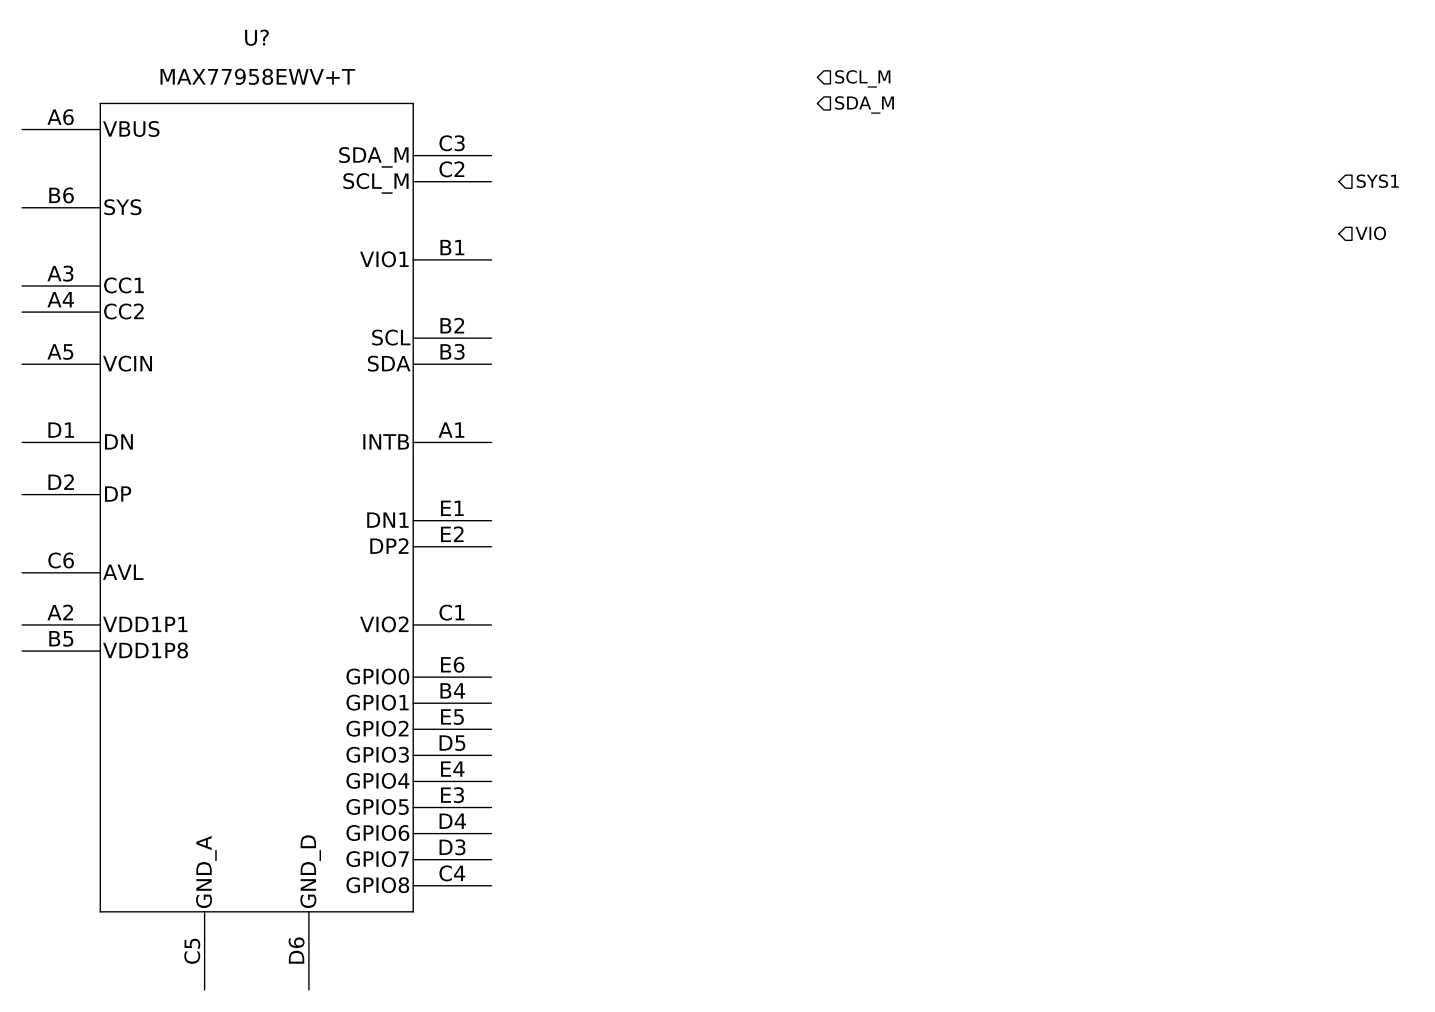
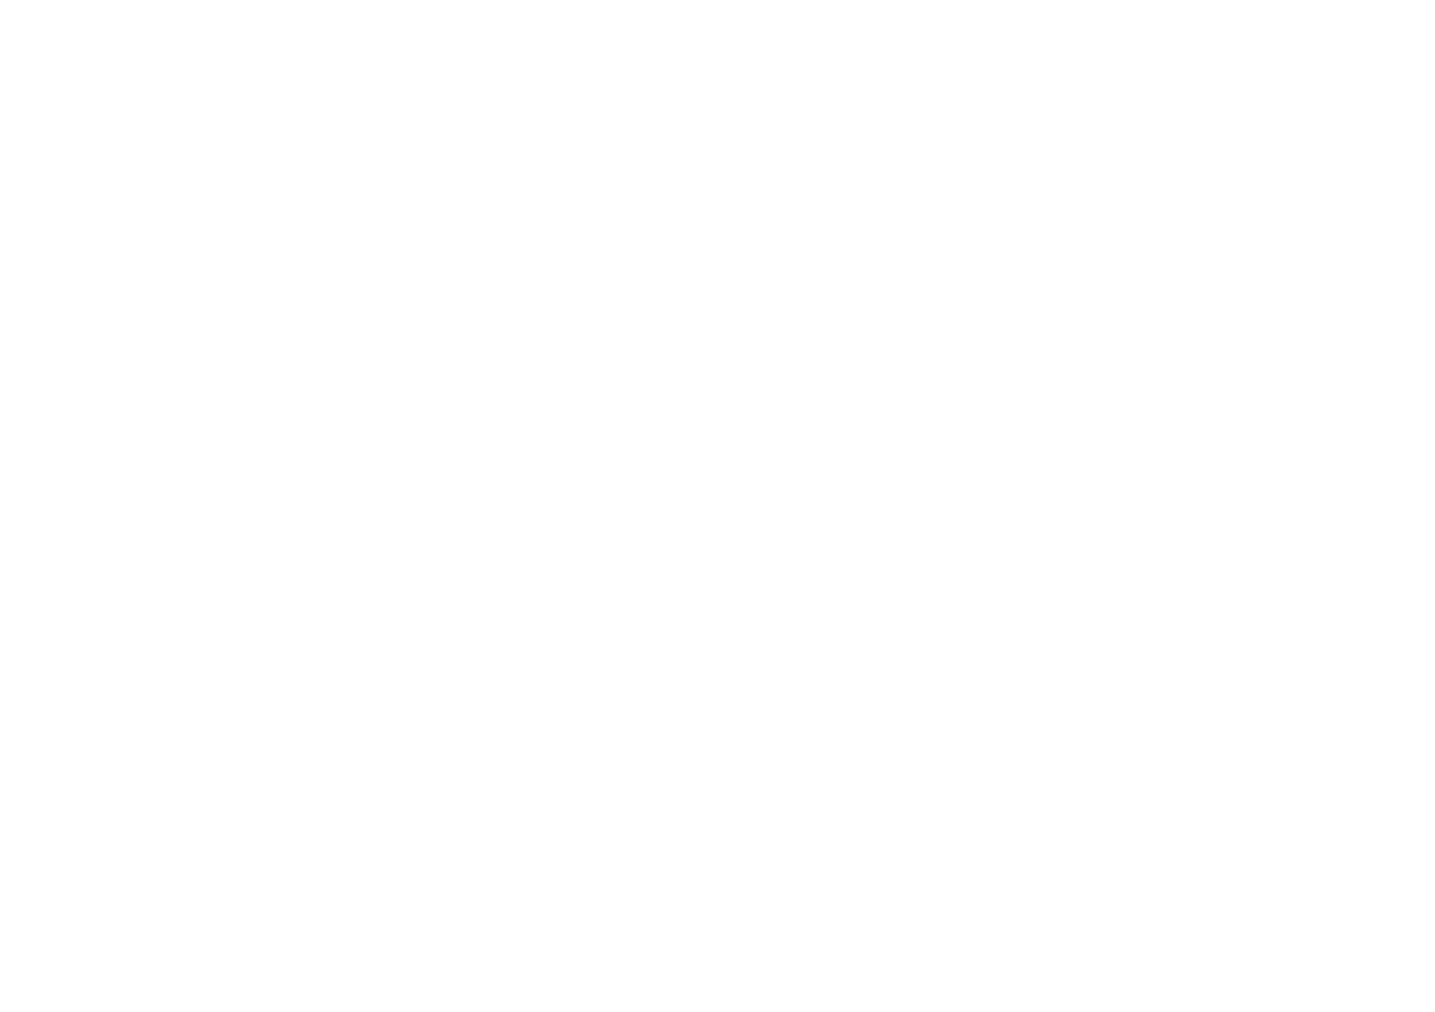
hierarchical label: SCL_M (862, 78) -> none
hierarchical label: SDA_M (864, 104) -> none
hierarchical label: SYS1 (1377, 181) -> none
hierarchical label: VIO (1370, 233) -> none
U?: MAX77958EWV+T (256, 546) -> none

